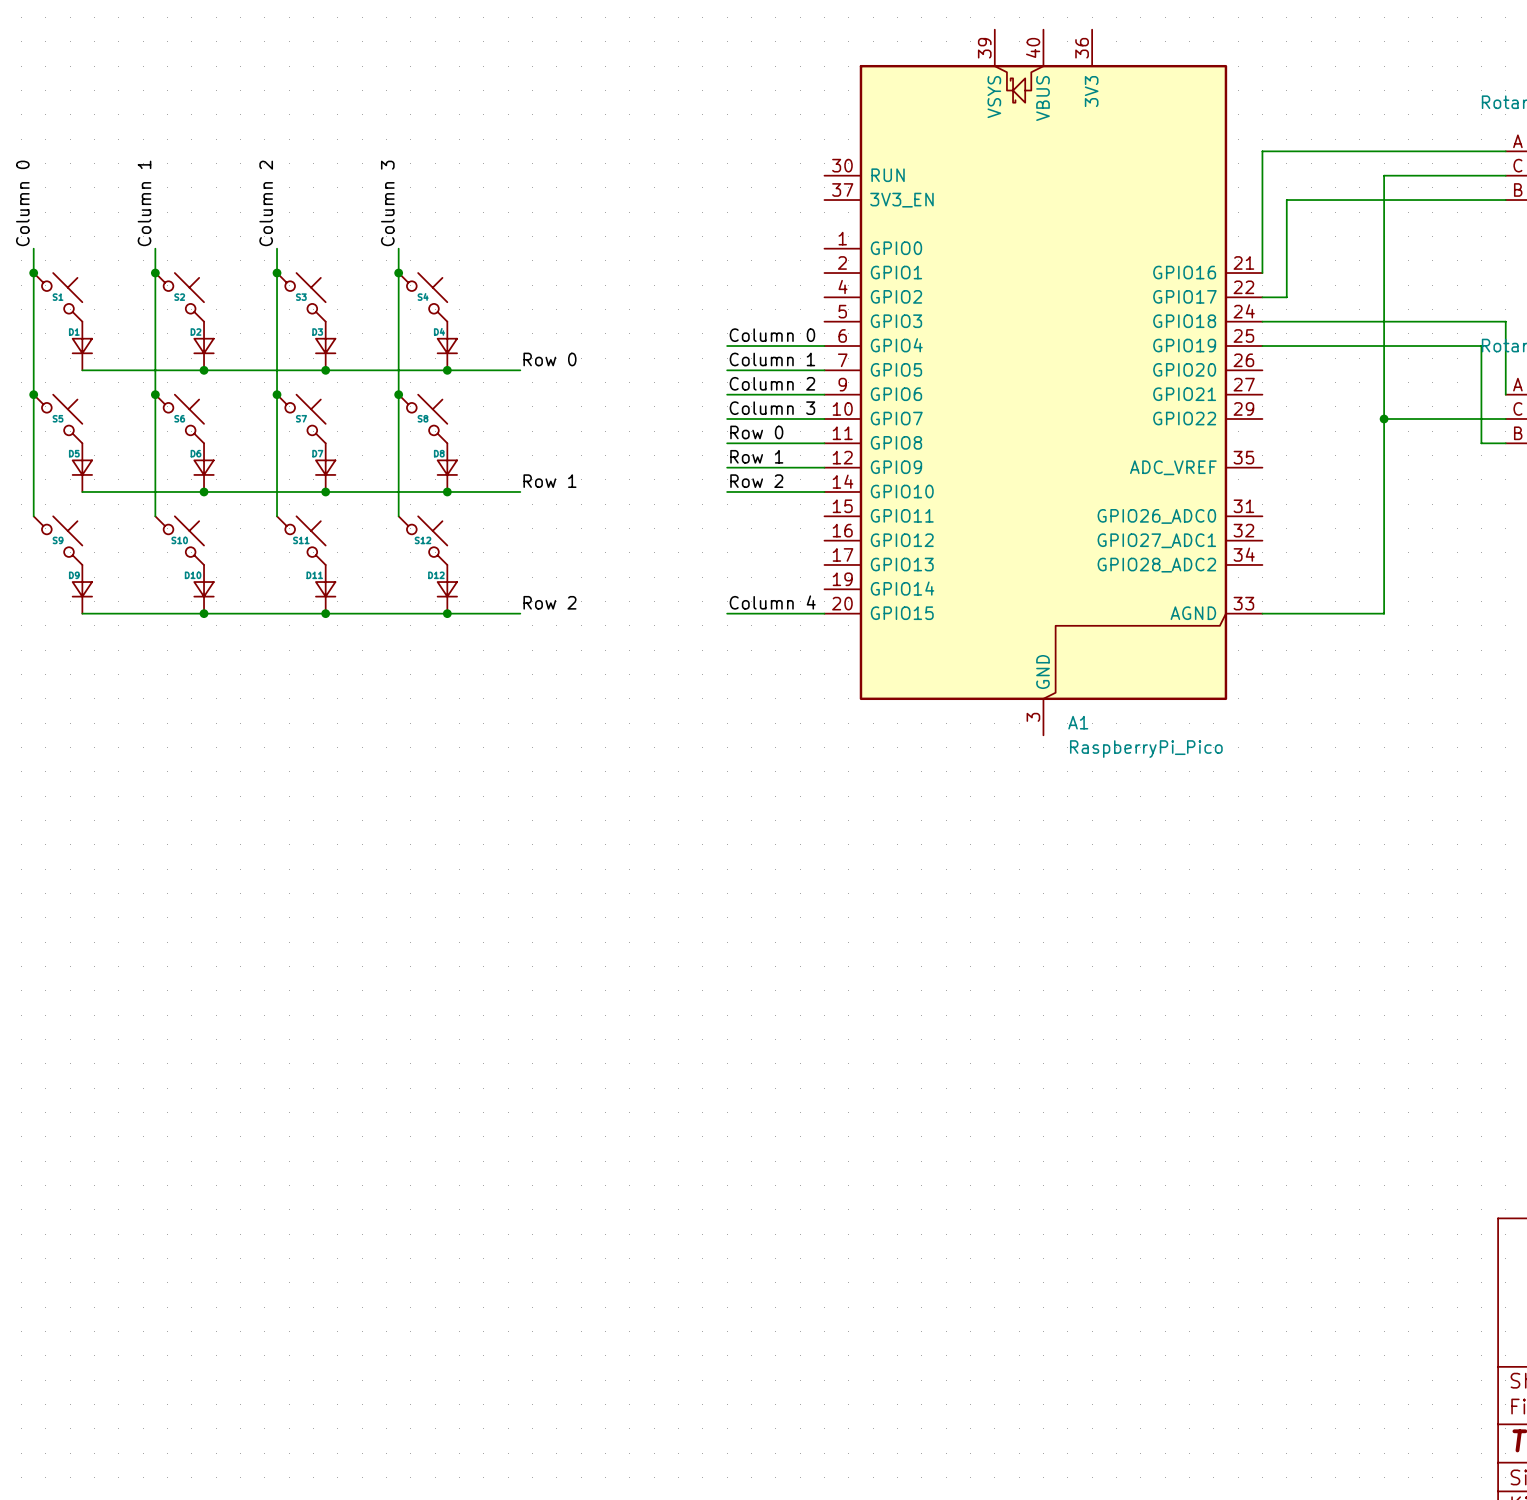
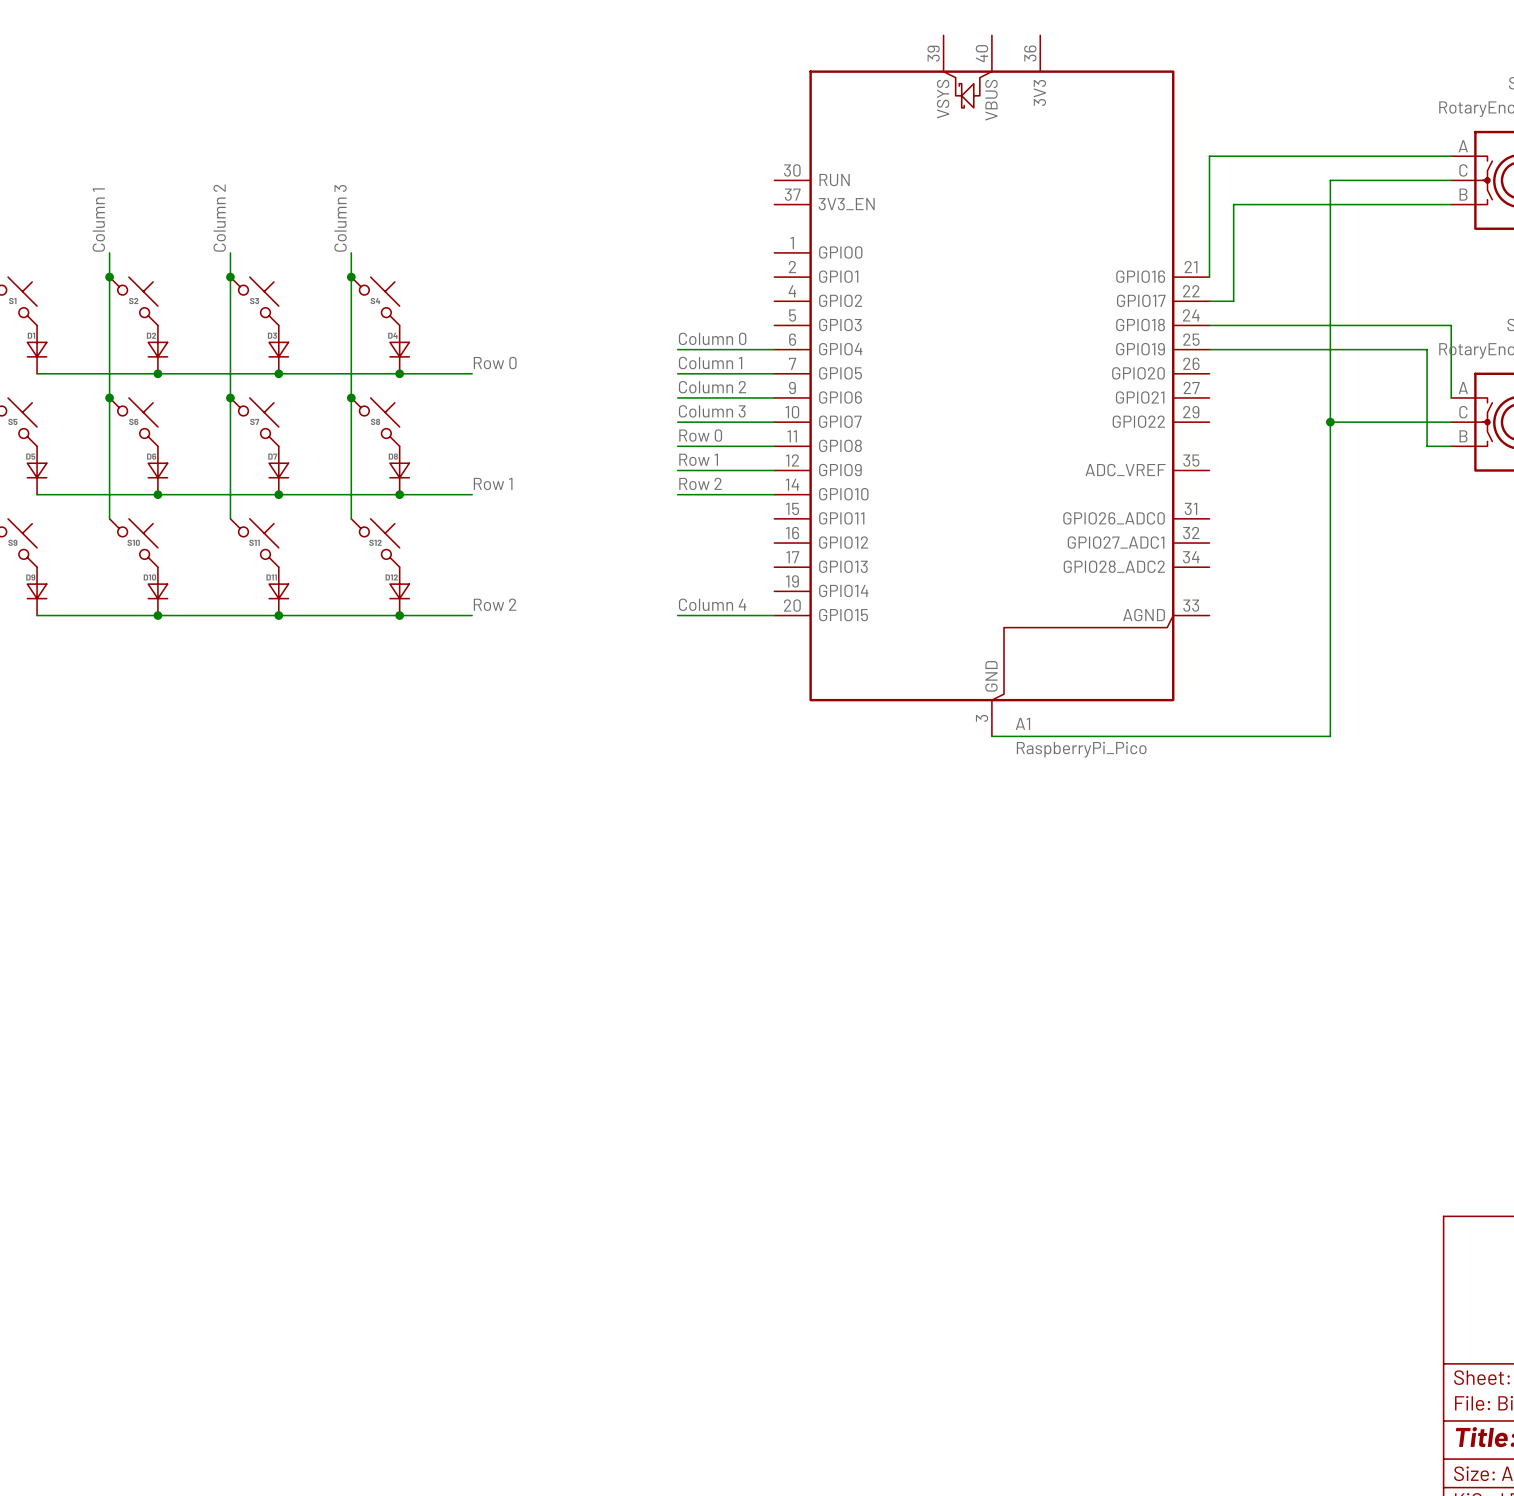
wire: (1262, 613) (1384, 613) -> (991, 736) (1330, 736) (1330, 615)

